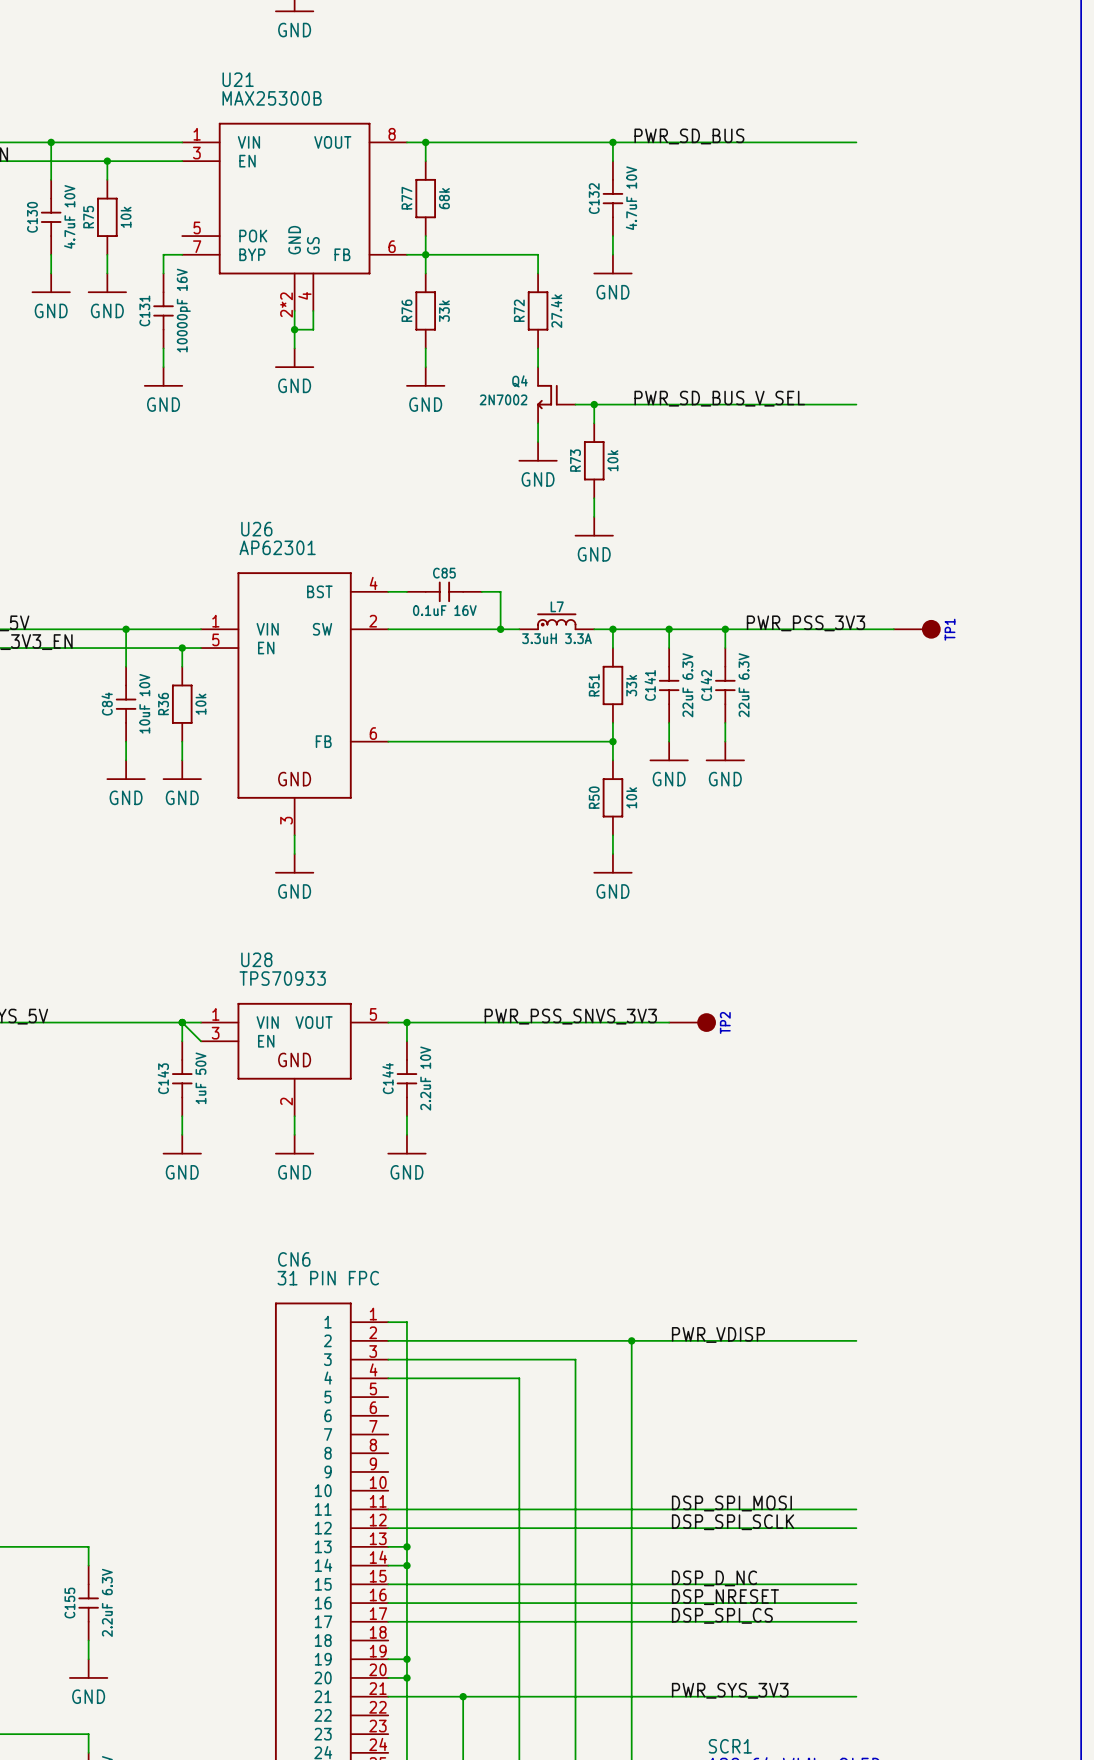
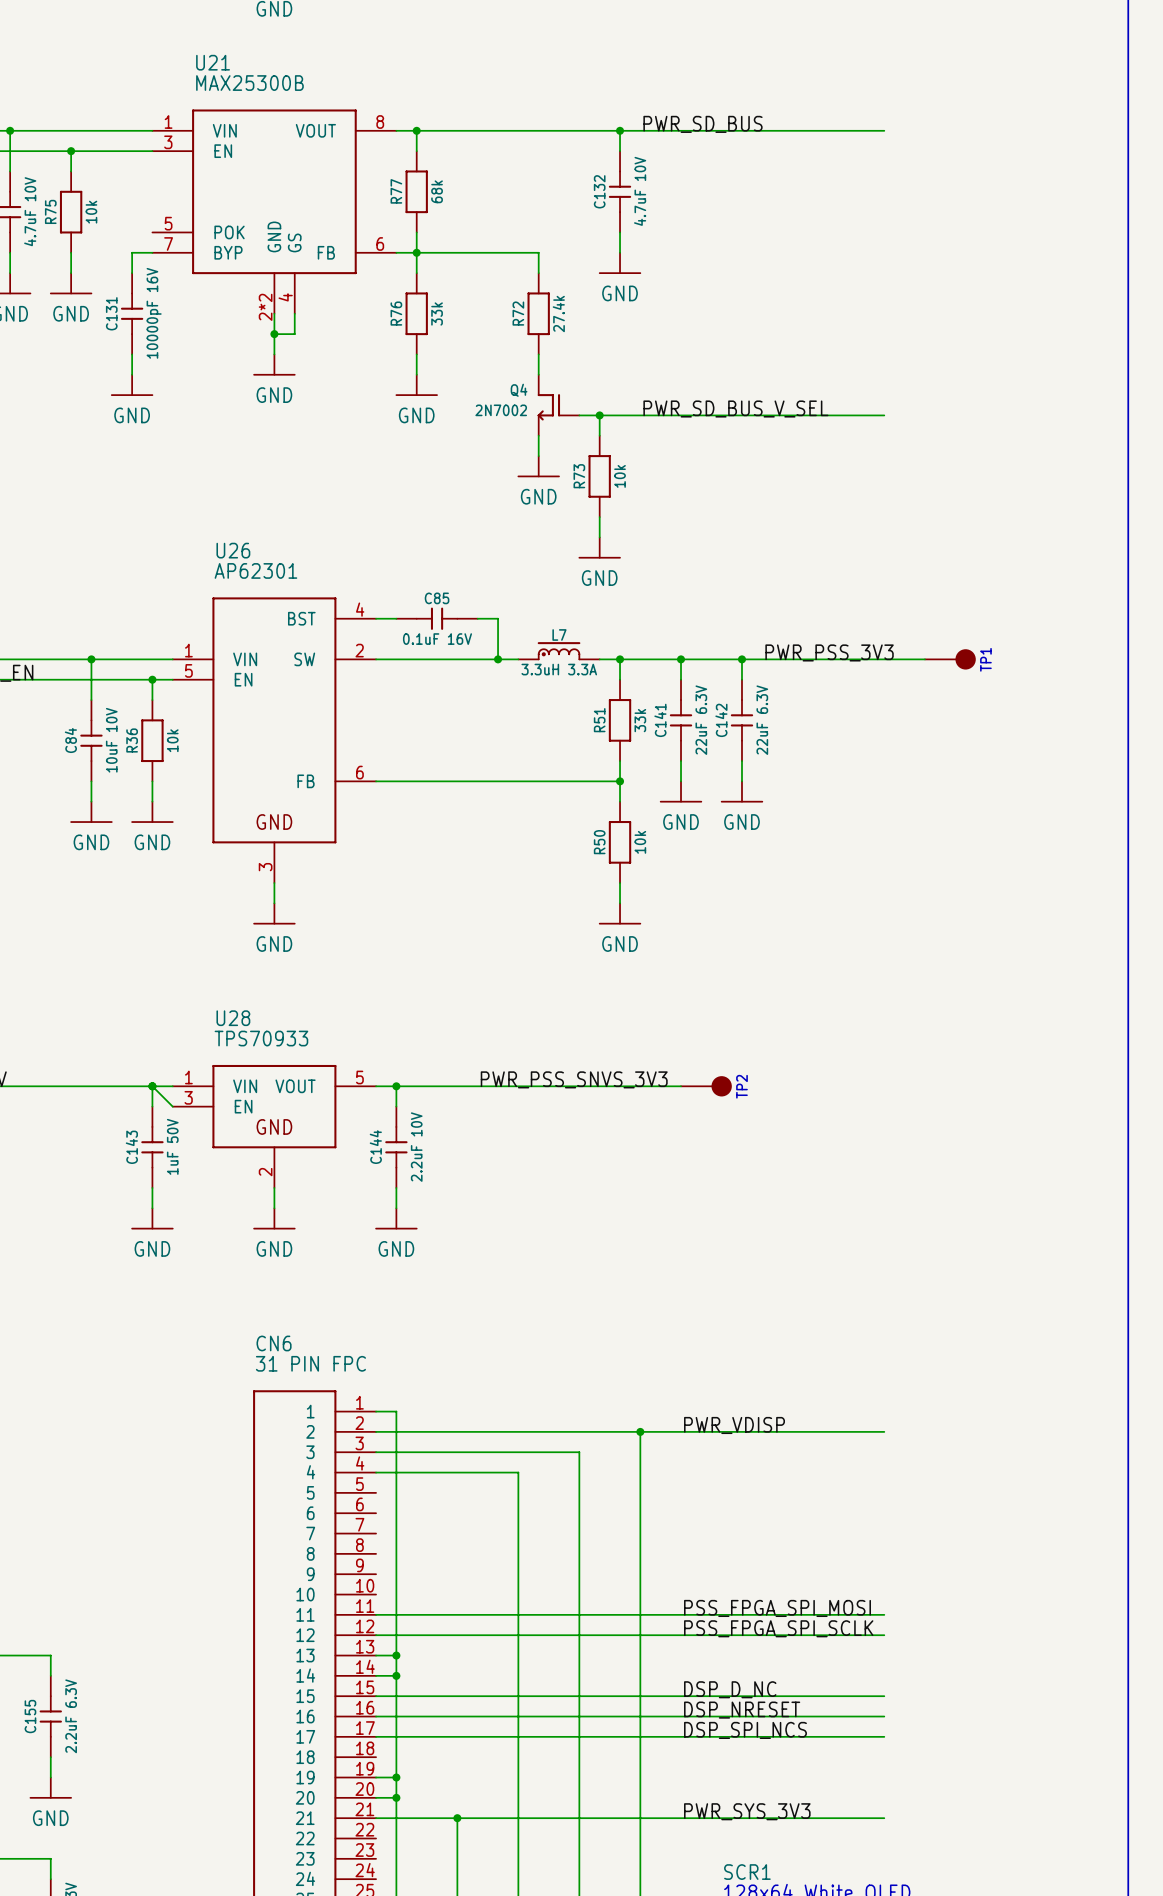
label: DSP_SPI_MOSI (731, 1503) -> PSS_FPGA_SPI_MOSI (777, 1608)
label: DSP_SPI_SCLK (733, 1522) -> PSS_FPGA_SPI_SCLK (778, 1628)
label: DSP_SPI_CS (722, 1615) -> DSP_SPI_NCS (745, 1730)

